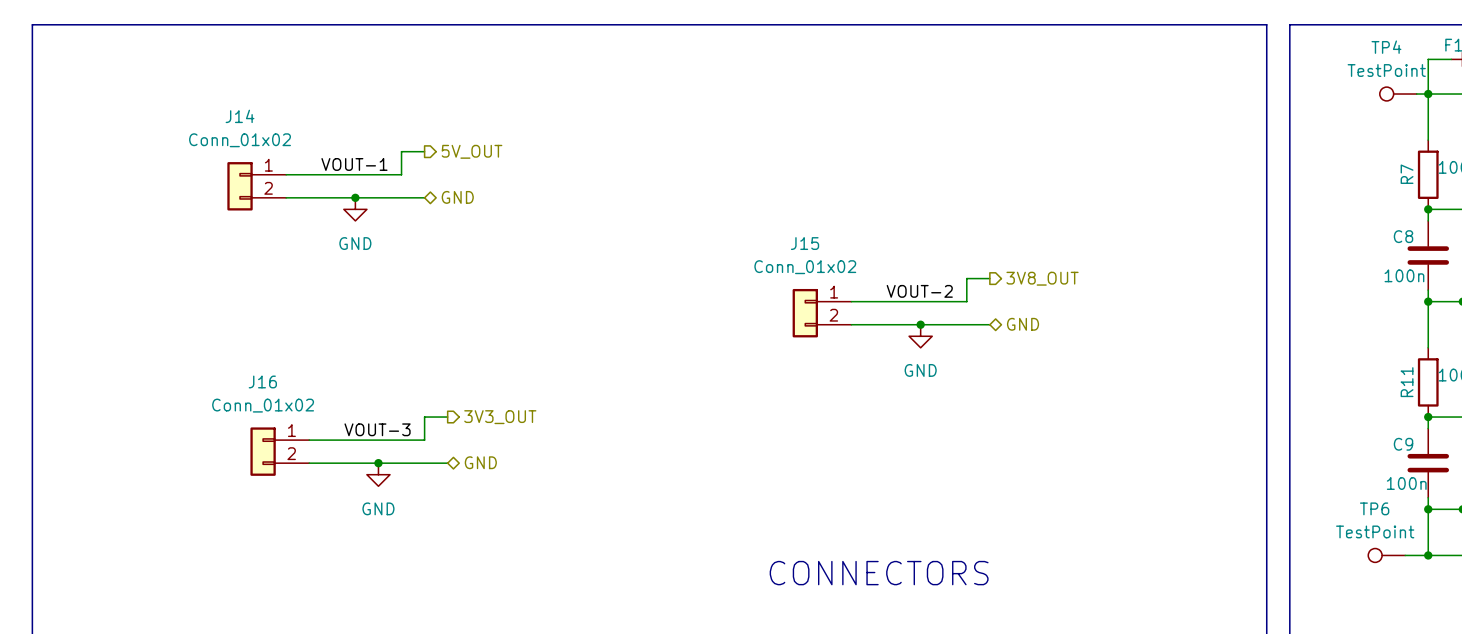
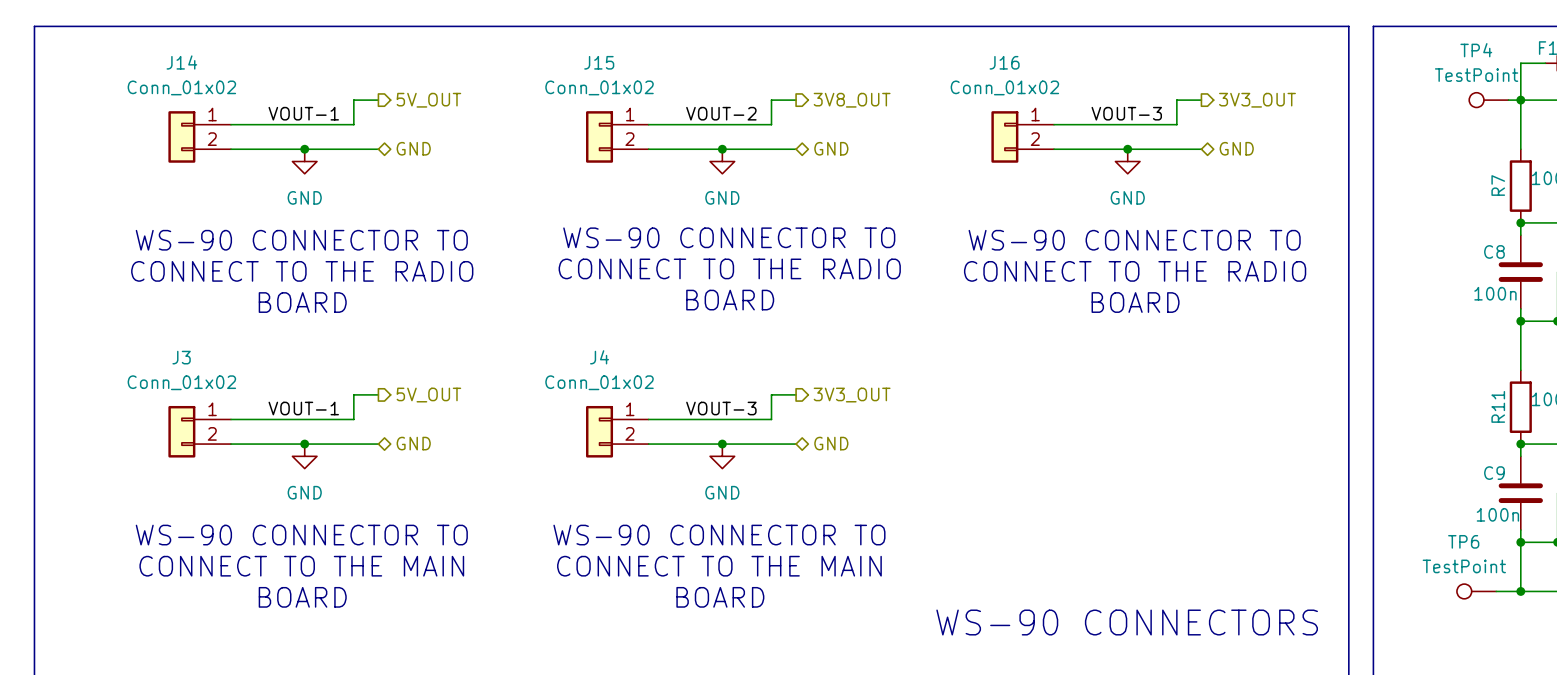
wire: none -> (796, 100) (771, 100) (771, 124) (648, 124)
hierarchical label: none -> 3V8_OUT (852, 100)
wire: none -> (1201, 100) (1176, 100) (1176, 124) (1054, 124)
hierarchical label: none -> 3V3_OUT (1257, 100)
label: none -> VOUT-2 (721, 113)
label: none -> VOUT-3 (1126, 113)
hierarchical label: none -> GND (831, 148)
hierarchical label: none -> GND (1236, 148)
junction: none -> (304, 149)
wire: none -> (648, 149) (796, 149)
junction: none -> (722, 149)
wire: none -> (1054, 149) (1201, 149)
junction: none -> (1127, 149)
wire: (424, 151) (401, 151) (401, 174) (286, 174) -> (378, 100) (353, 100) (353, 124) (231, 124)
hierarchical label position: 5V_OUT (472, 151) -> 5V_OUT (428, 100)
power symbol: none -> GND (722, 161)
power symbol: none -> GND (1127, 161)
label position: VOUT-1 (354, 164) -> VOUT-1 (303, 113)
J14 position: (256, 186) -> (199, 136)
wire: (286, 197) (424, 197) -> (231, 149) (378, 149)
junction: (355, 197) -> none
hierarchical label position: GND (457, 197) -> GND (413, 148)
power symbol position: GND (355, 209) -> GND (304, 161)
text: none -> WS-90 CONNECTOR TO (729, 237)
text: none -> WS-90 CONNECTOR TO (301, 240)
text: none -> WS-90 CONNECTOR TO (1134, 240)
text: none -> CONNECT TO THE RADIO (729, 268)
text: none -> CONNECT TO THE RADIO (302, 271)
text: none -> CONNECT TO THE RADIO (1135, 271)
wire: (989, 278) (966, 278) (966, 301) (851, 301) -> none
hierarchical label: 3V8_OUT (1042, 278) -> none
text: none -> BOARD (730, 300)
text: none -> BOARD (302, 302)
text: none -> BOARD (1135, 302)
label: VOUT-2 (919, 291) -> none
J15 position: (822, 313) -> (617, 136)
wire: (851, 324) (989, 324) -> none
junction: (920, 324) -> none
hierarchical label: GND (1023, 324) -> none
power symbol: GND (920, 336) -> none
hierarchical label: none -> 5V_OUT (428, 395)
wire: none -> (796, 394) (771, 394) (771, 419) (648, 419)
hierarchical label: none -> 3V3_OUT (852, 395)
label: none -> VOUT-1 (303, 408)
label: none -> VOUT-3 (721, 408)
J3: none -> Conn_01x02 (199, 431)
J4: none -> Conn_01x02 (617, 431)
hierarchical label: none -> GND (831, 443)
junction: none -> (304, 444)
wire: (447, 417) (424, 417) (424, 440) (309, 440) -> (378, 394) (353, 394) (353, 419) (231, 419)
hierarchical label: 3V3_OUT (500, 417) -> none
wire: none -> (648, 444) (796, 444)
junction: none -> (722, 444)
power symbol: none -> GND (722, 456)
label: VOUT-3 (377, 429) -> none
J16 position: (279, 451) -> (1022, 136)
hierarchical label position: GND (480, 462) -> GND (413, 443)
wire: (309, 463) (447, 463) -> (231, 444) (378, 444)
junction: (378, 463) -> none
power symbol position: GND (378, 474) -> GND (304, 456)
text: none -> WS-90 CONNECTOR TO (301, 535)
text: none -> WS-90 CONNECTOR TO (719, 535)
text: none -> CONNECT TO THE MAIN (301, 566)
text: none -> CONNECT TO THE MAIN (719, 566)
text: none -> BOARD (302, 597)
text: none -> BOARD (720, 597)
text: CONNECTORS (879, 573) -> WS-90 CONNECTORS (1127, 622)

